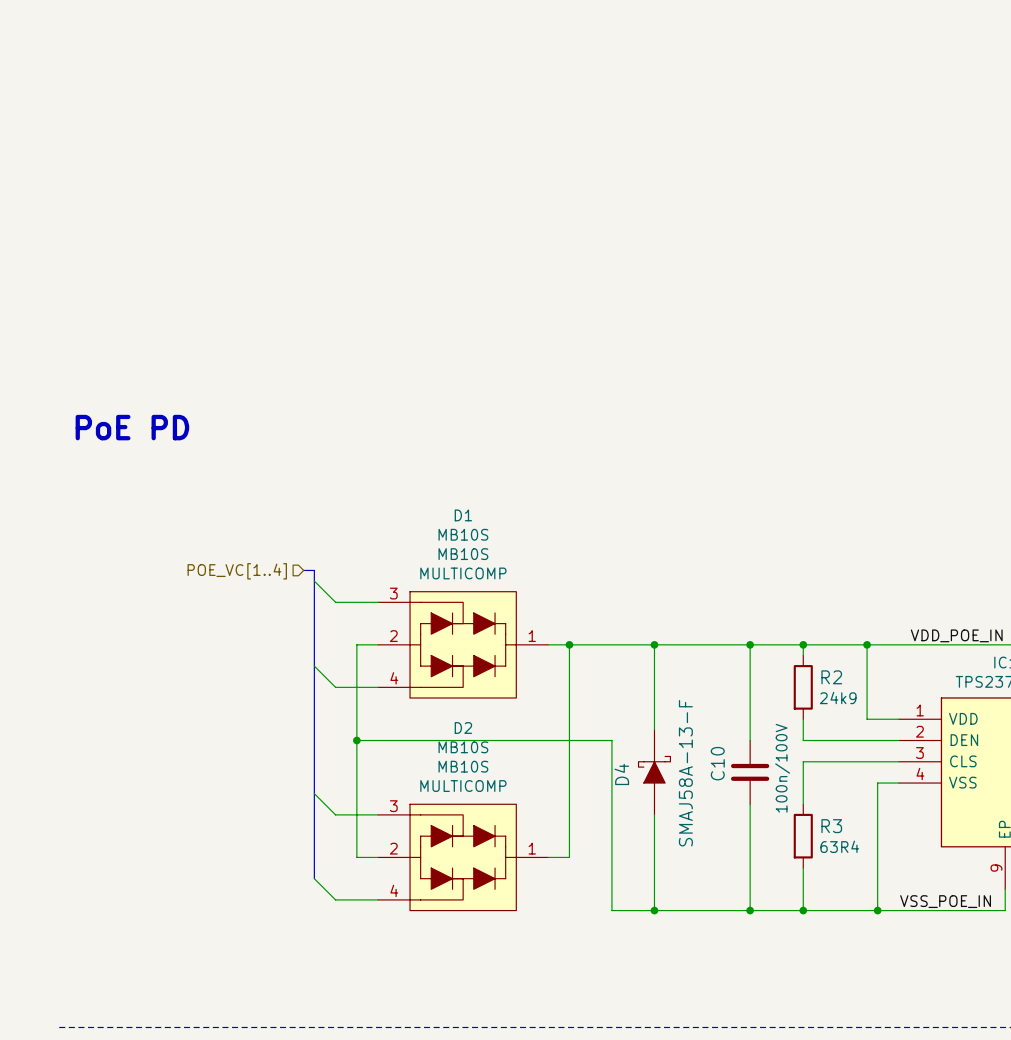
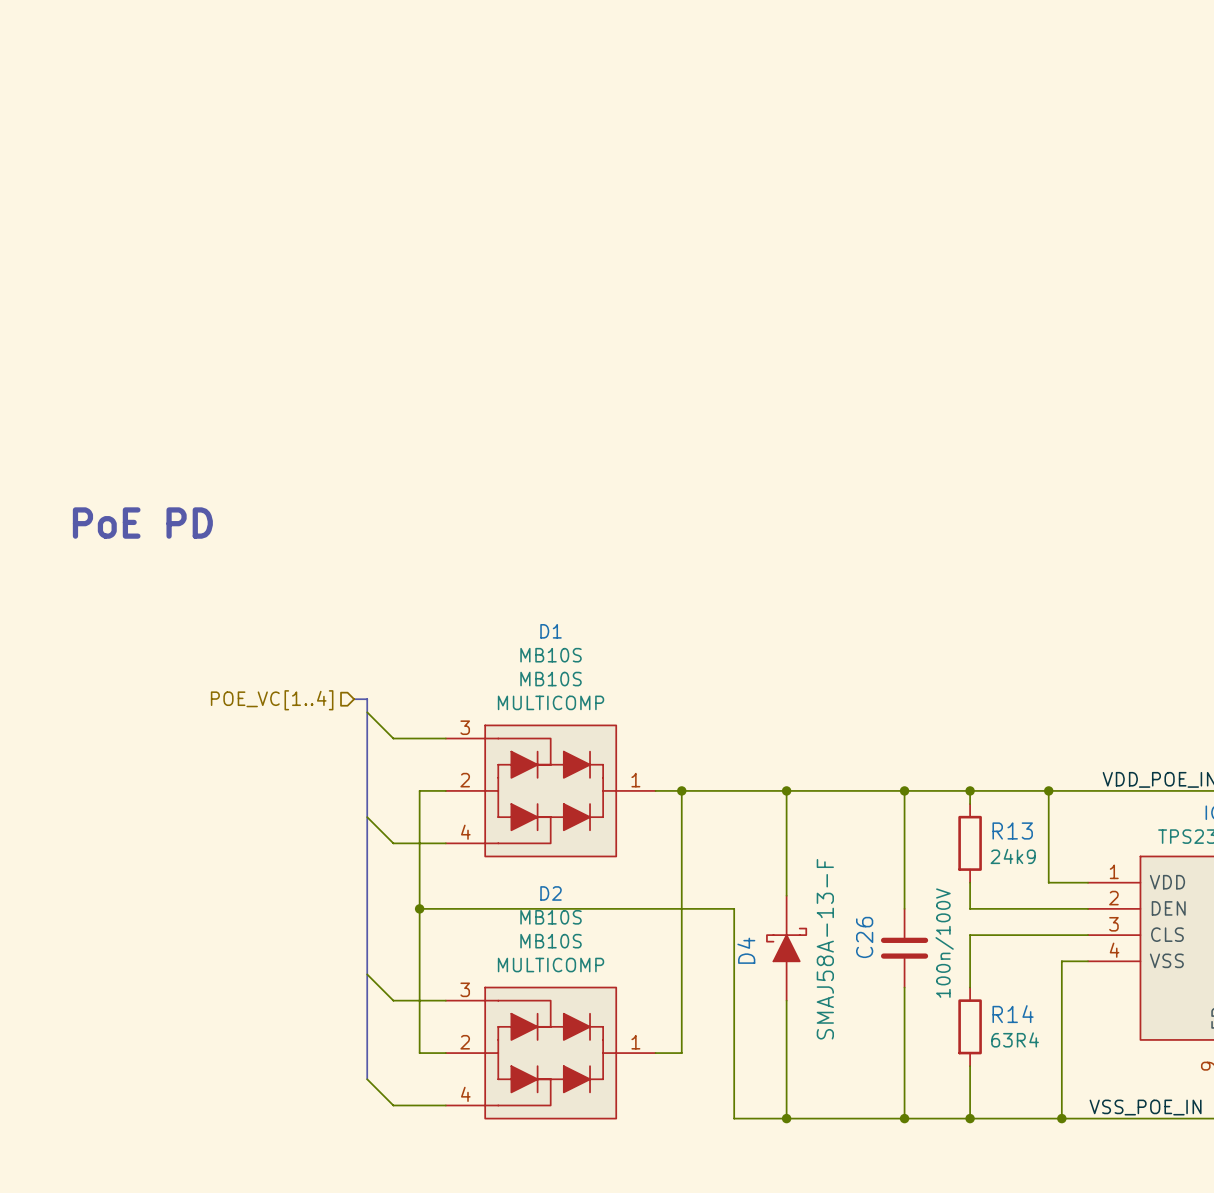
R2 name: R2 (831, 677) -> R13 (1012, 830)
C10 name: C10 (717, 763) -> C26 (864, 937)
R3 name: R3 (831, 826) -> R14 (1013, 1014)

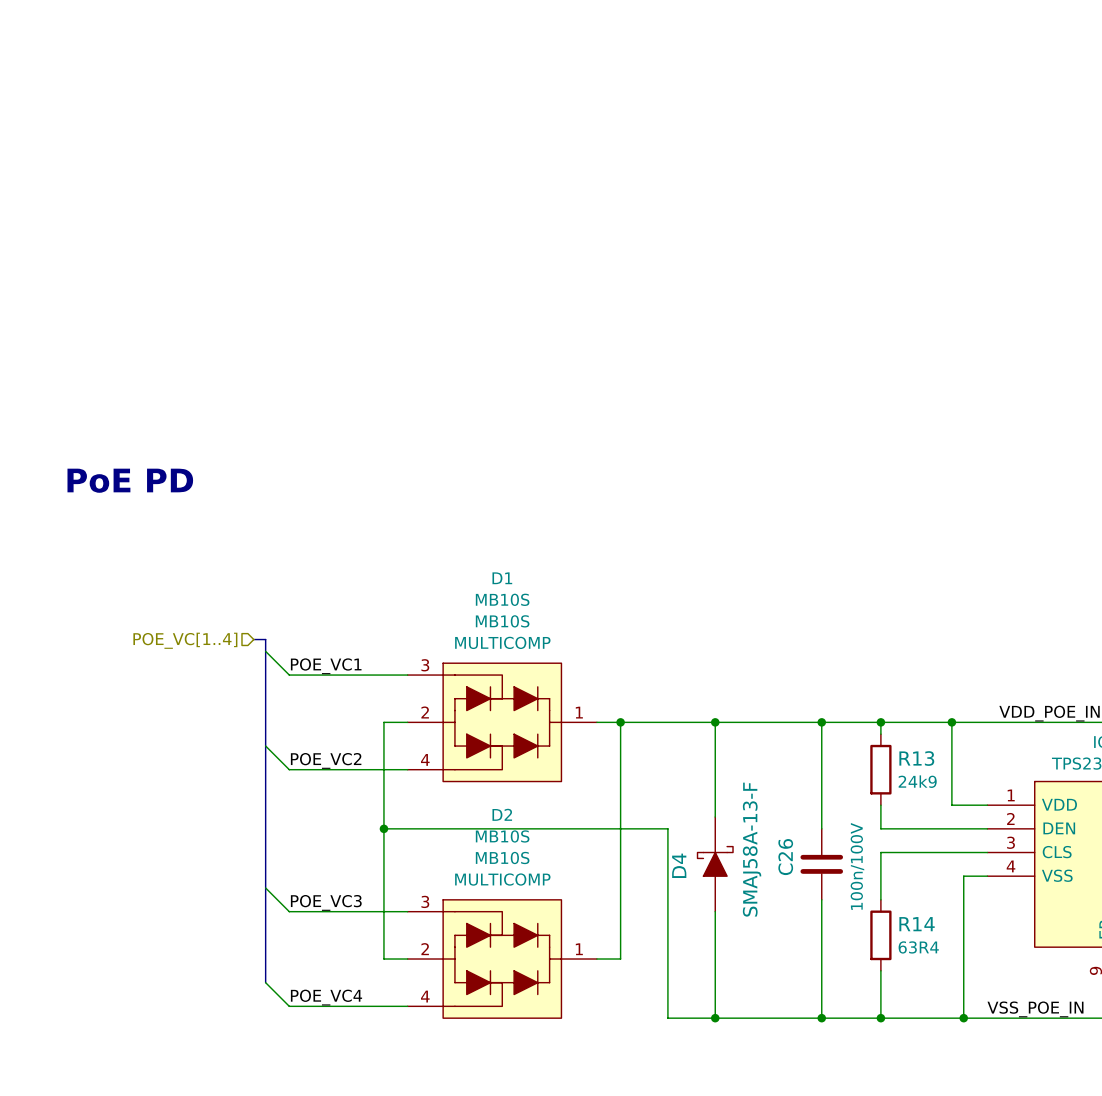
bus: (354, 699) (367, 699) (367, 1079) -> (253, 639) (265, 639) (265, 982)
hierarchical label position: POE_VC[1..4] (272, 700) -> POE_VC[1..4] (185, 640)
wire: (367, 712) (393, 738) -> (265, 651) (289, 675) (360, 675)
label: none -> POE_VC1 (326, 666)
wire: (367, 817) (393, 843) -> (265, 746) (289, 769) (360, 769)
label: none -> POE_VC2 (326, 760)
wire: (367, 974) (393, 1000) -> (265, 888) (289, 911) (360, 911)
label: none -> POE_VC3 (326, 902)
wire: (367, 1079) (393, 1105) -> (265, 982) (289, 1006) (360, 1006)
label: none -> POE_VC4 (326, 997)

